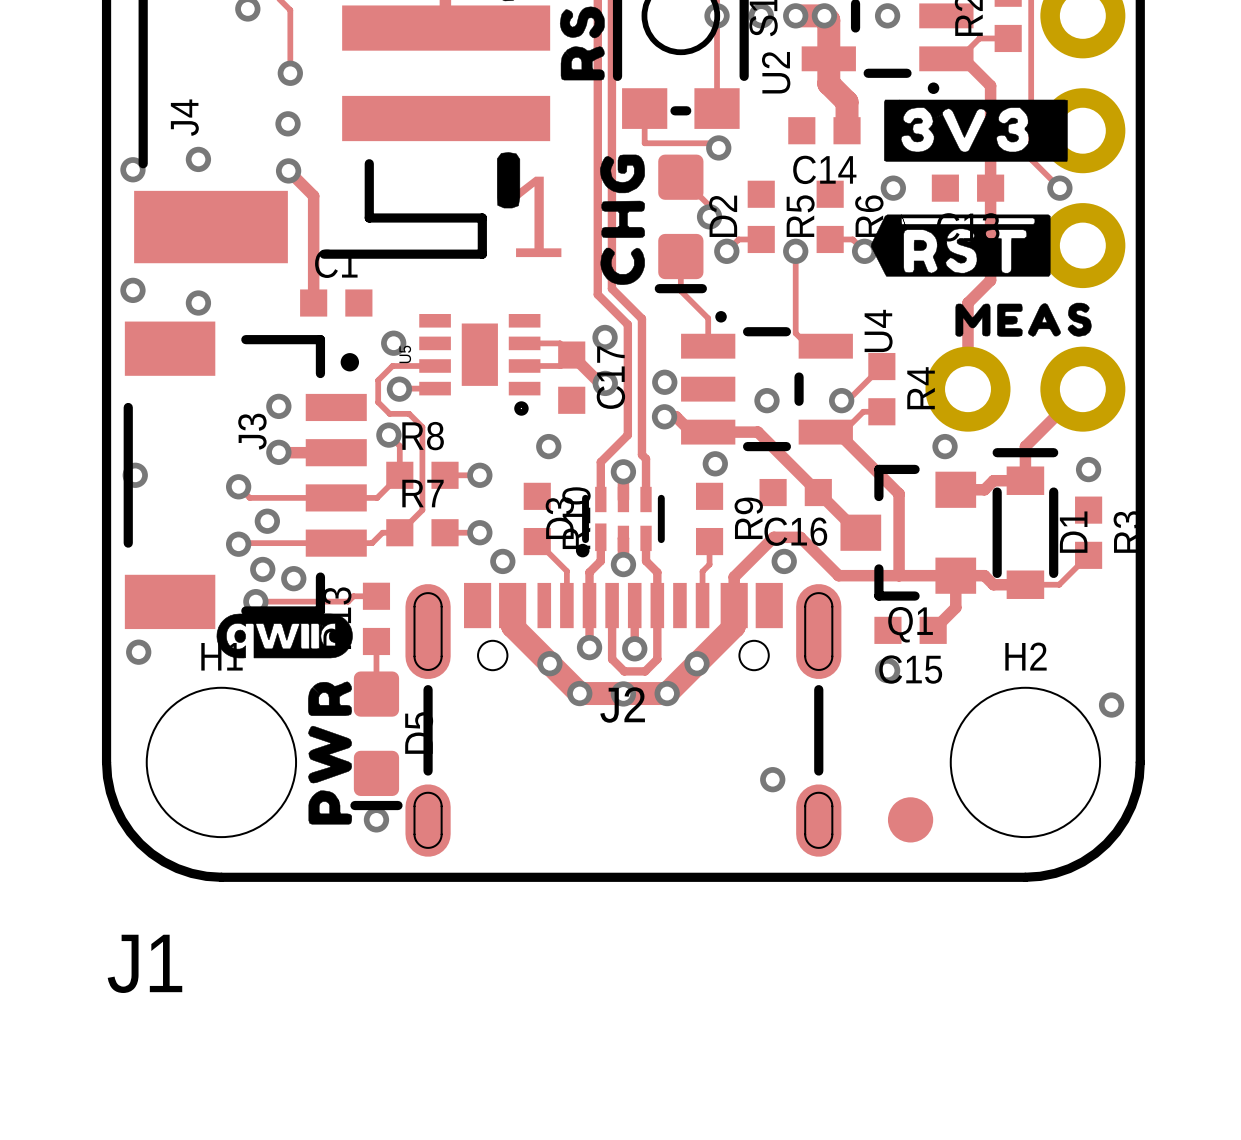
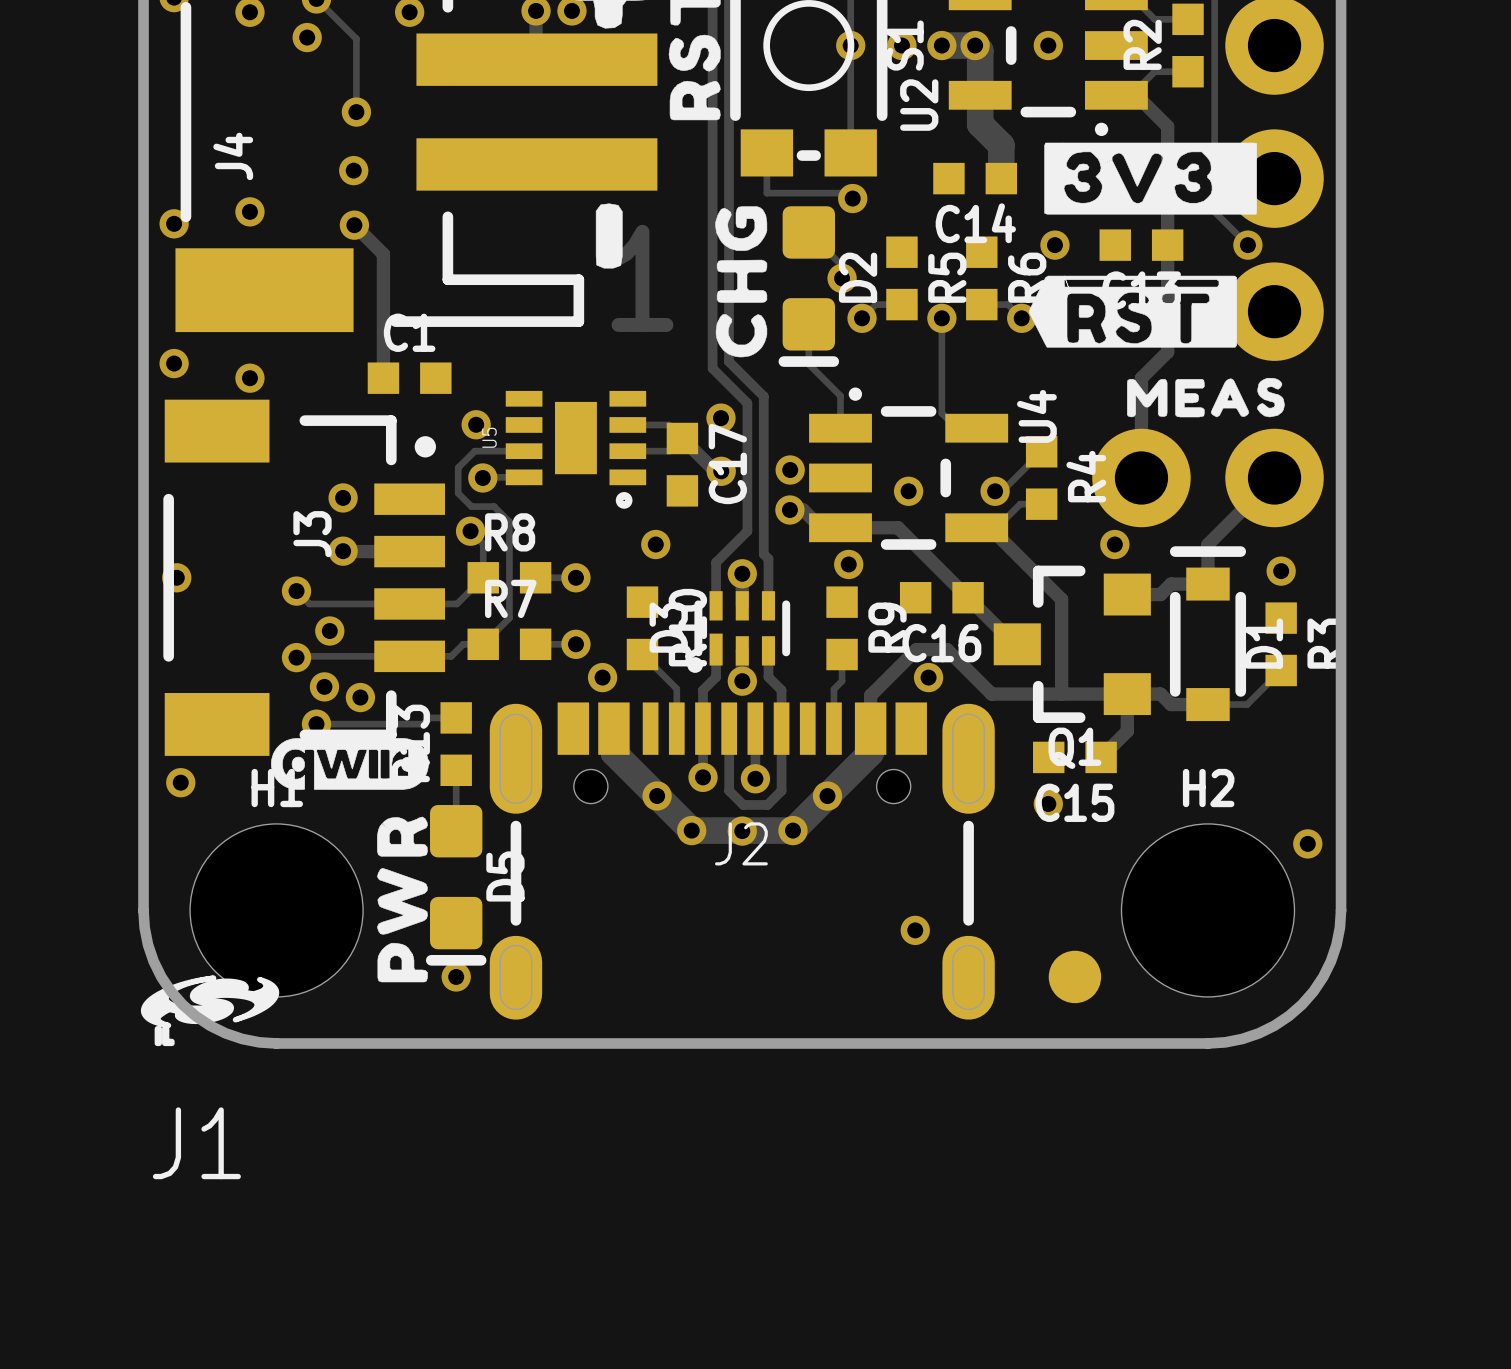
drawing: none -> [140, 975, 280, 1047]

